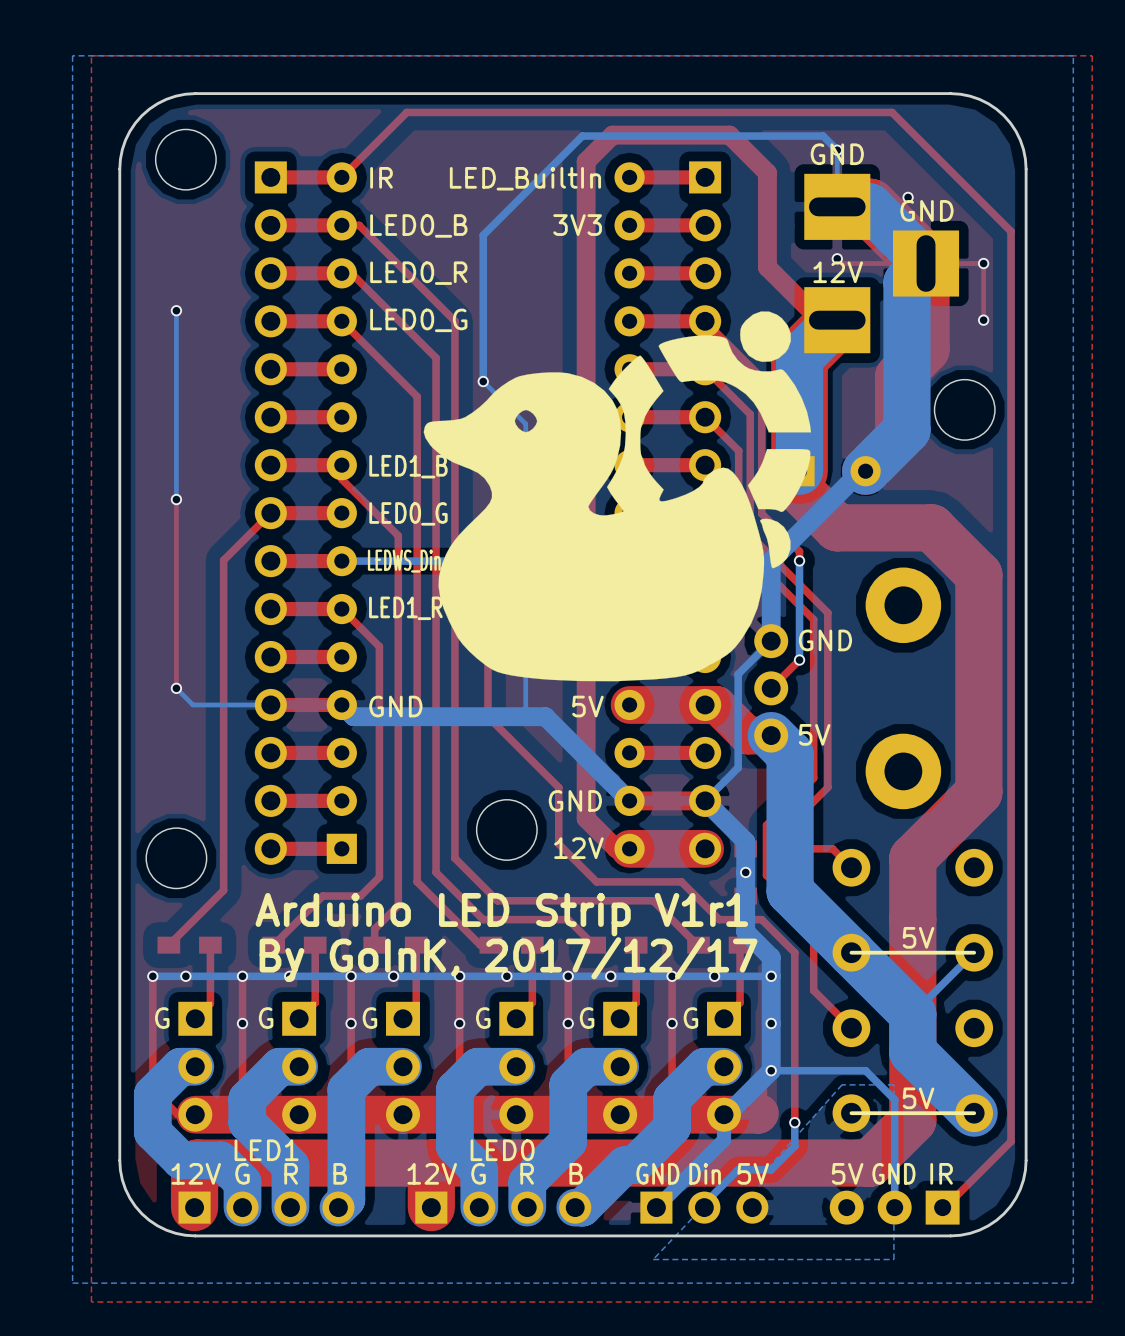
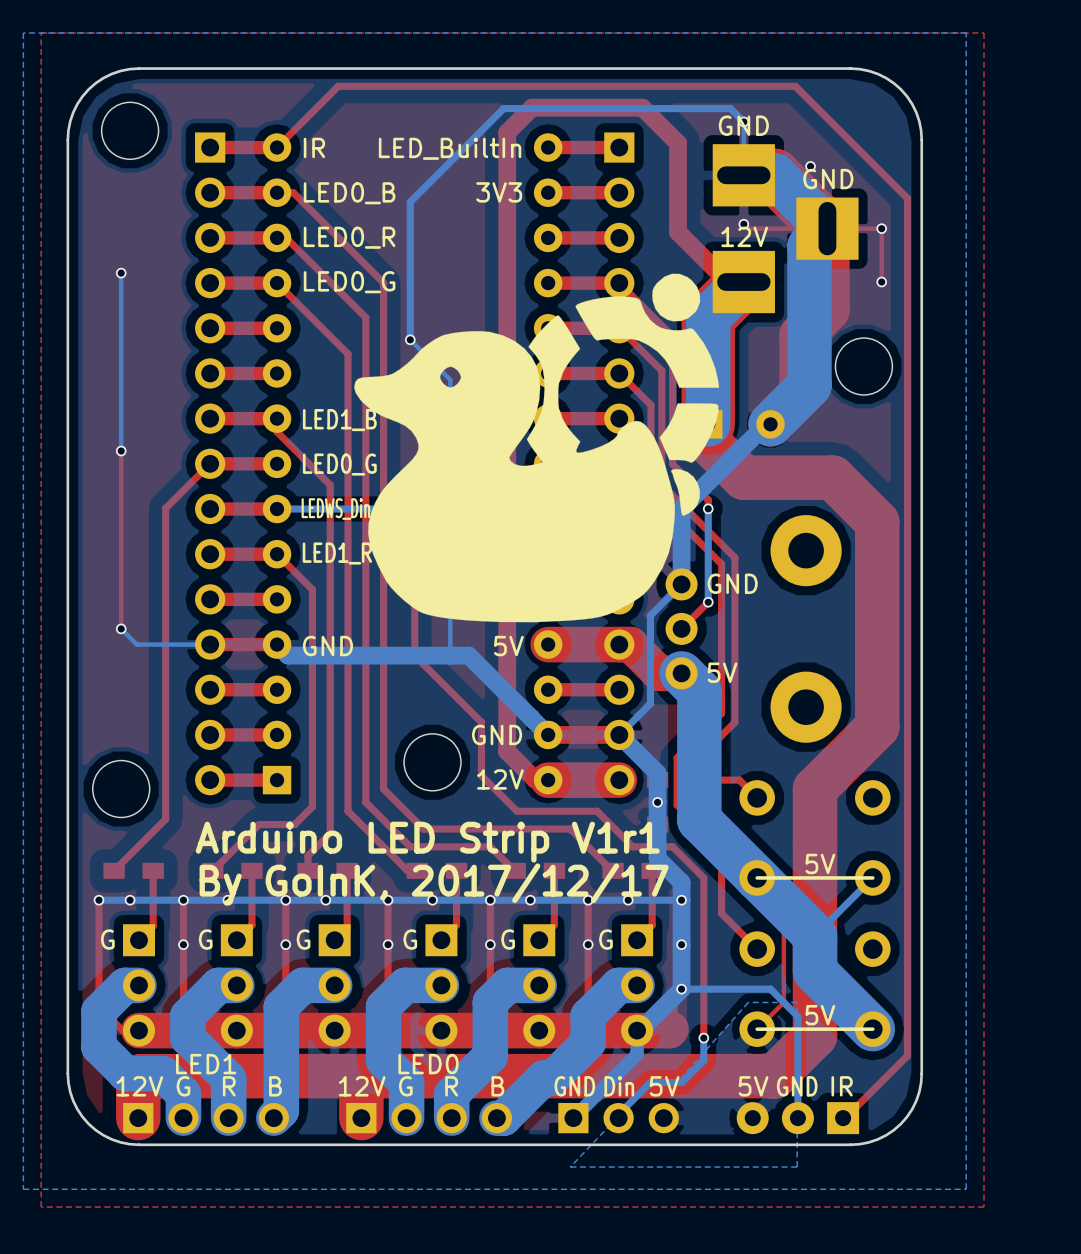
top track: none -> (757, 877) (757, 891) (783, 917) (783, 1002) (757, 1029)

